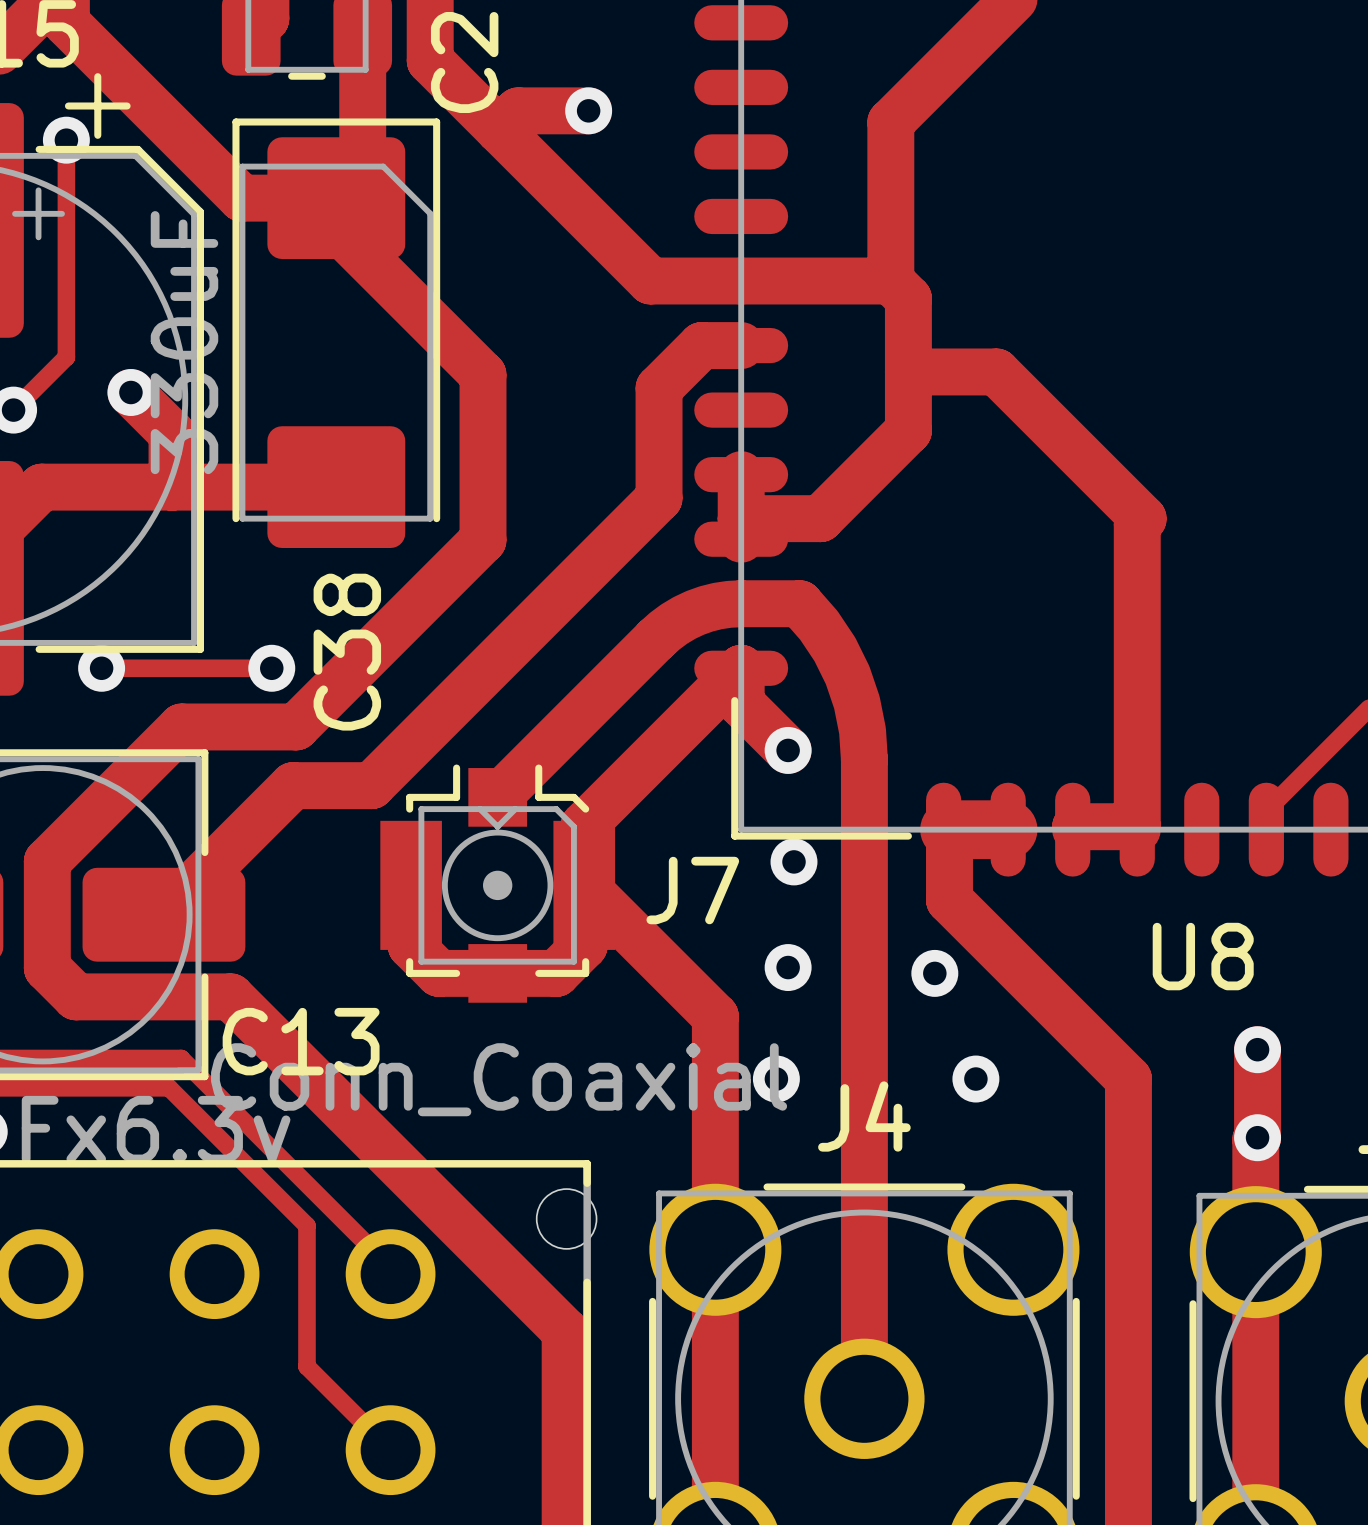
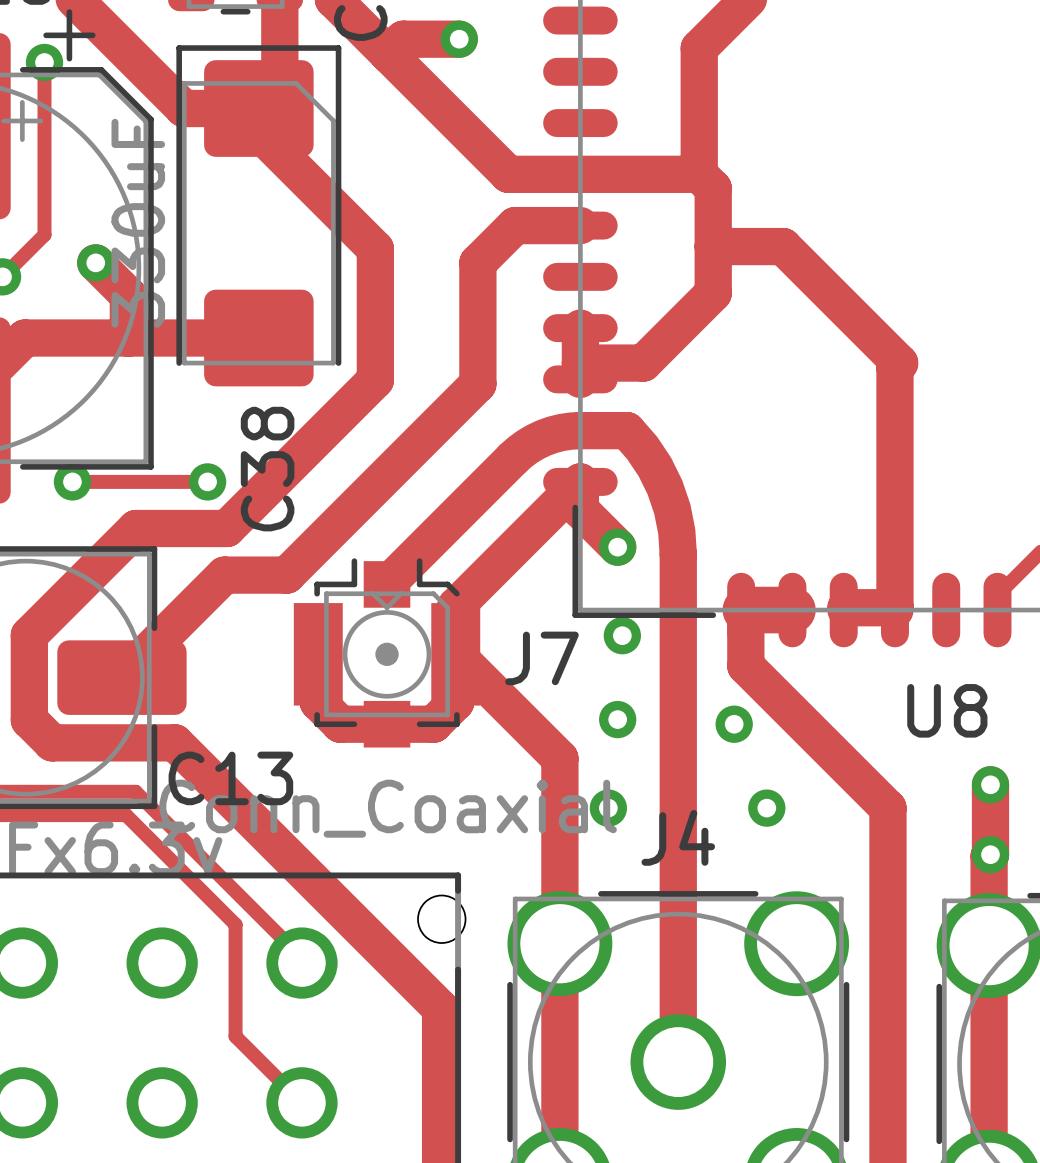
track: (701, 345) (659, 388) (659, 498) (612, 545) -> (549, 225) (515, 225) (477, 262) (477, 384)

